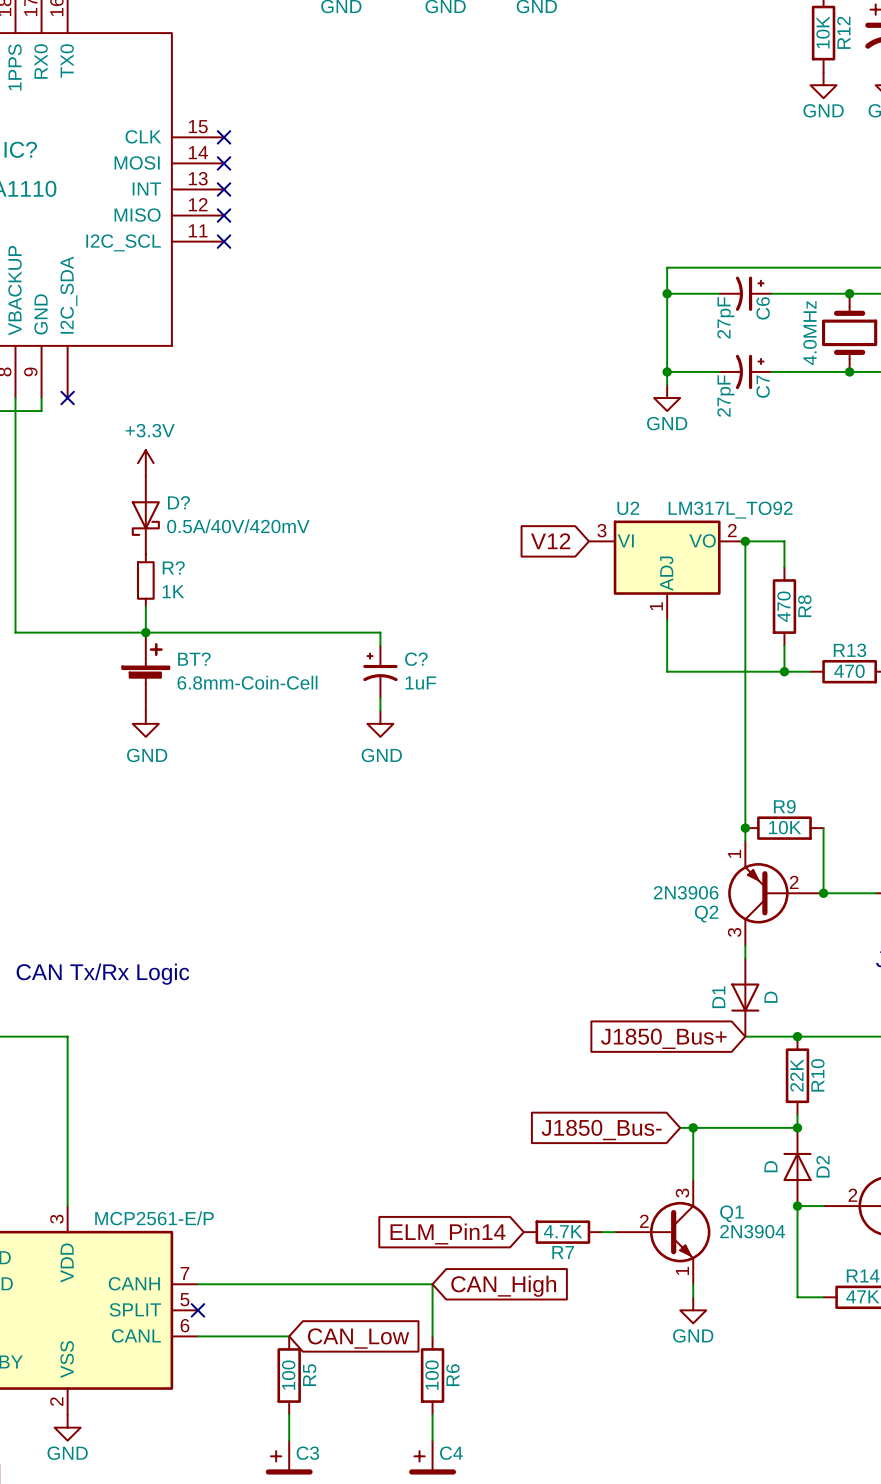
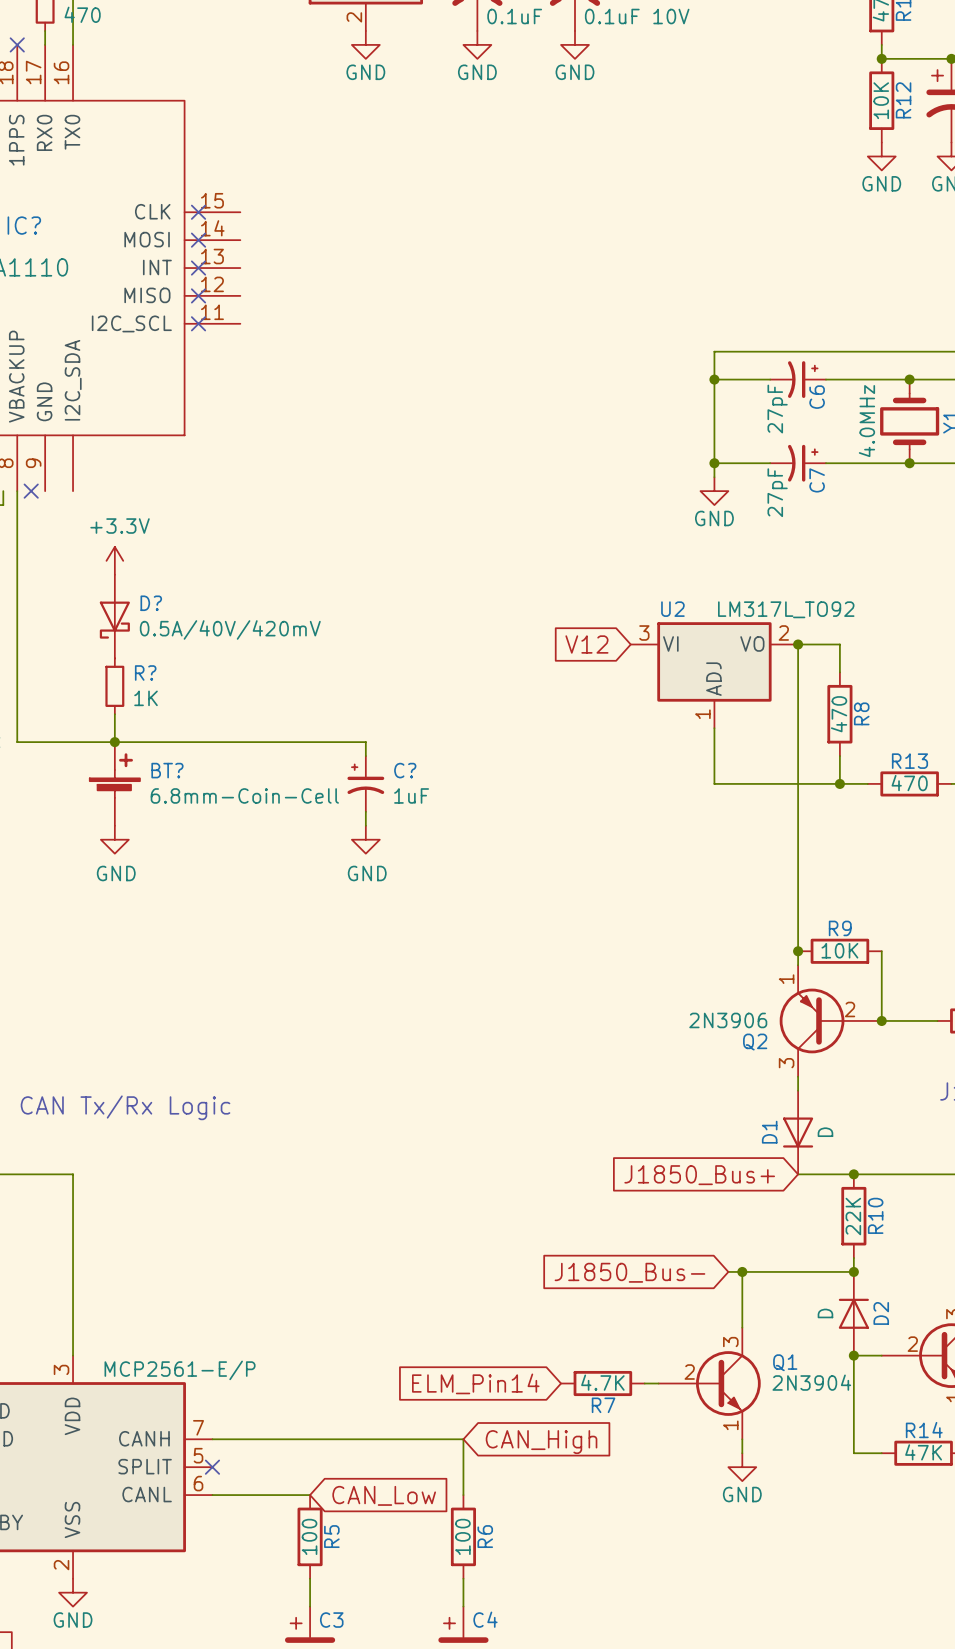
no-connect mark: none -> (198, 212)
no-connect mark: (224, 137) -> none
no-connect mark: none -> (198, 240)
no-connect mark: (224, 163) -> none
no-connect mark: none -> (198, 268)
no-connect mark: (224, 189) -> none
no-connect mark: none -> (198, 295)
no-connect mark: (224, 215) -> none
no-connect mark: none -> (198, 323)
no-connect mark: (224, 241) -> none
wire: (41, 398) (41, 411) (2, 411) -> (3, 491) (3, 505)
no-connect mark position: (67, 398) -> (31, 491)
power symbol position: +3.3V (145, 463) -> +3.3V (114, 560)
D? position: (145, 515) -> (114, 616)
R? position: (145, 580) -> (114, 686)
wire: (145, 606) (145, 632) -> (114, 714) (114, 742)
junction position: (145, 632) -> (114, 742)
wire: (341, 632) (380, 632) (380, 645) -> (365, 742) (365, 756)
BT? position: (145, 671) -> (114, 783)
C? position: (380, 671) -> (365, 783)
wire: (380, 697) (380, 710) -> (365, 811) (365, 825)
power symbol position: GND (145, 723) -> GND (114, 839)
power symbol position: GND (380, 723) -> GND (365, 839)

